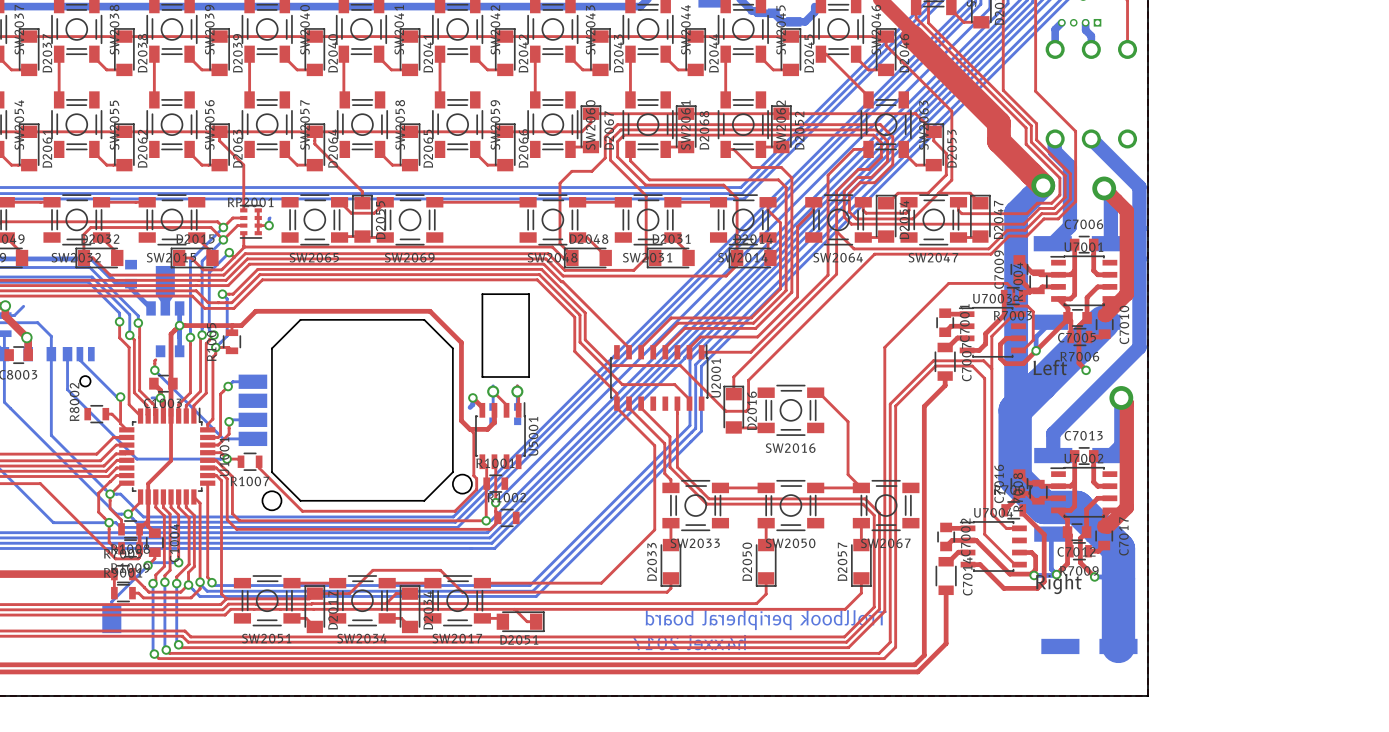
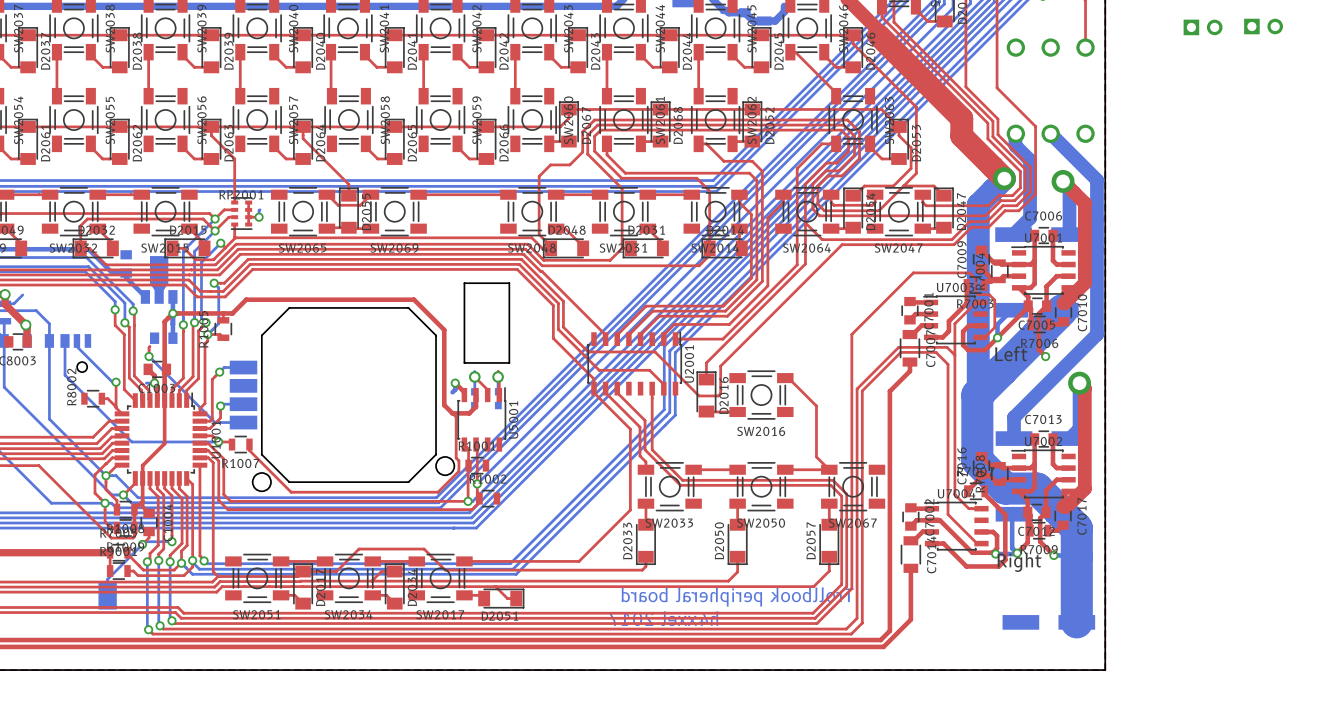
bottom track: (1061, 22) (1055, 29) (1055, 49) -> none
part: (1079, 22) -> none
bottom track: (1085, 22) (1085, 30) (1091, 35) (1091, 49) -> none
part: none -> (1263, 26)
part: none -> (1203, 27)

